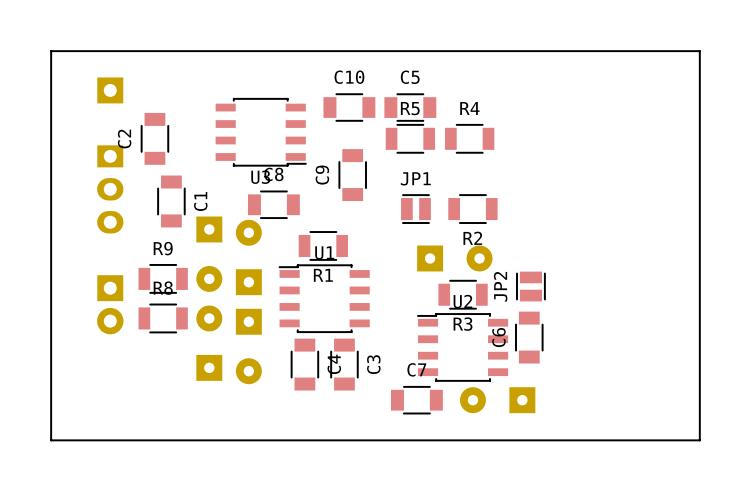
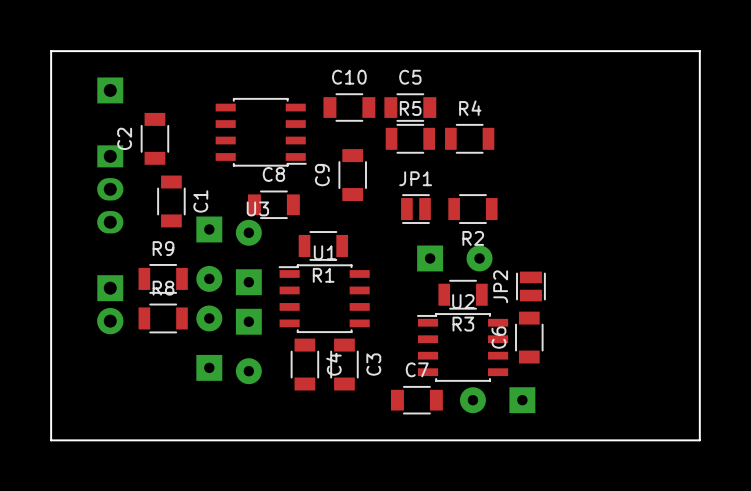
U3 name position: U3 (260, 177) -> U3 (257, 208)

